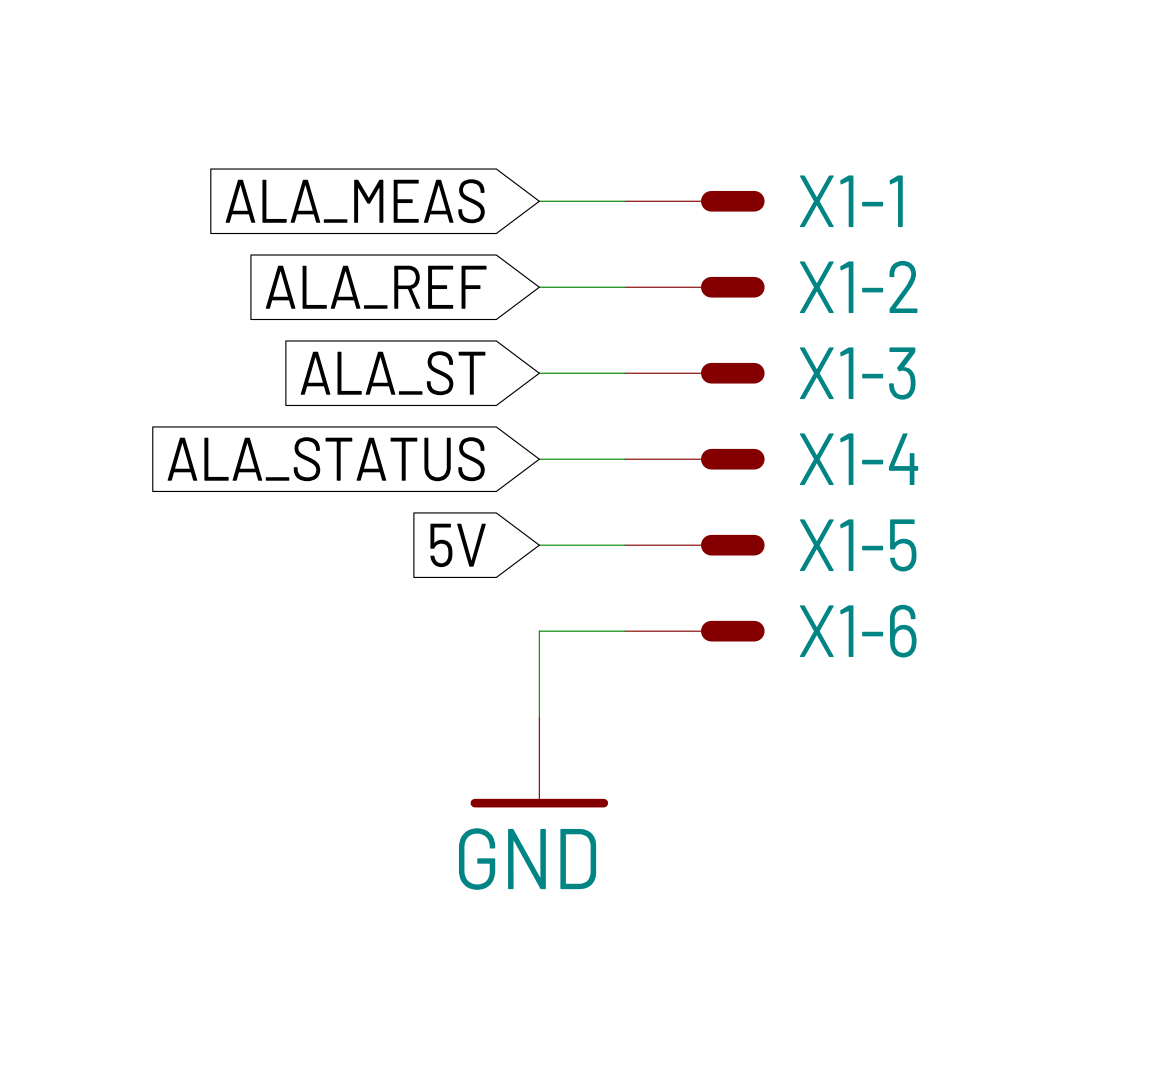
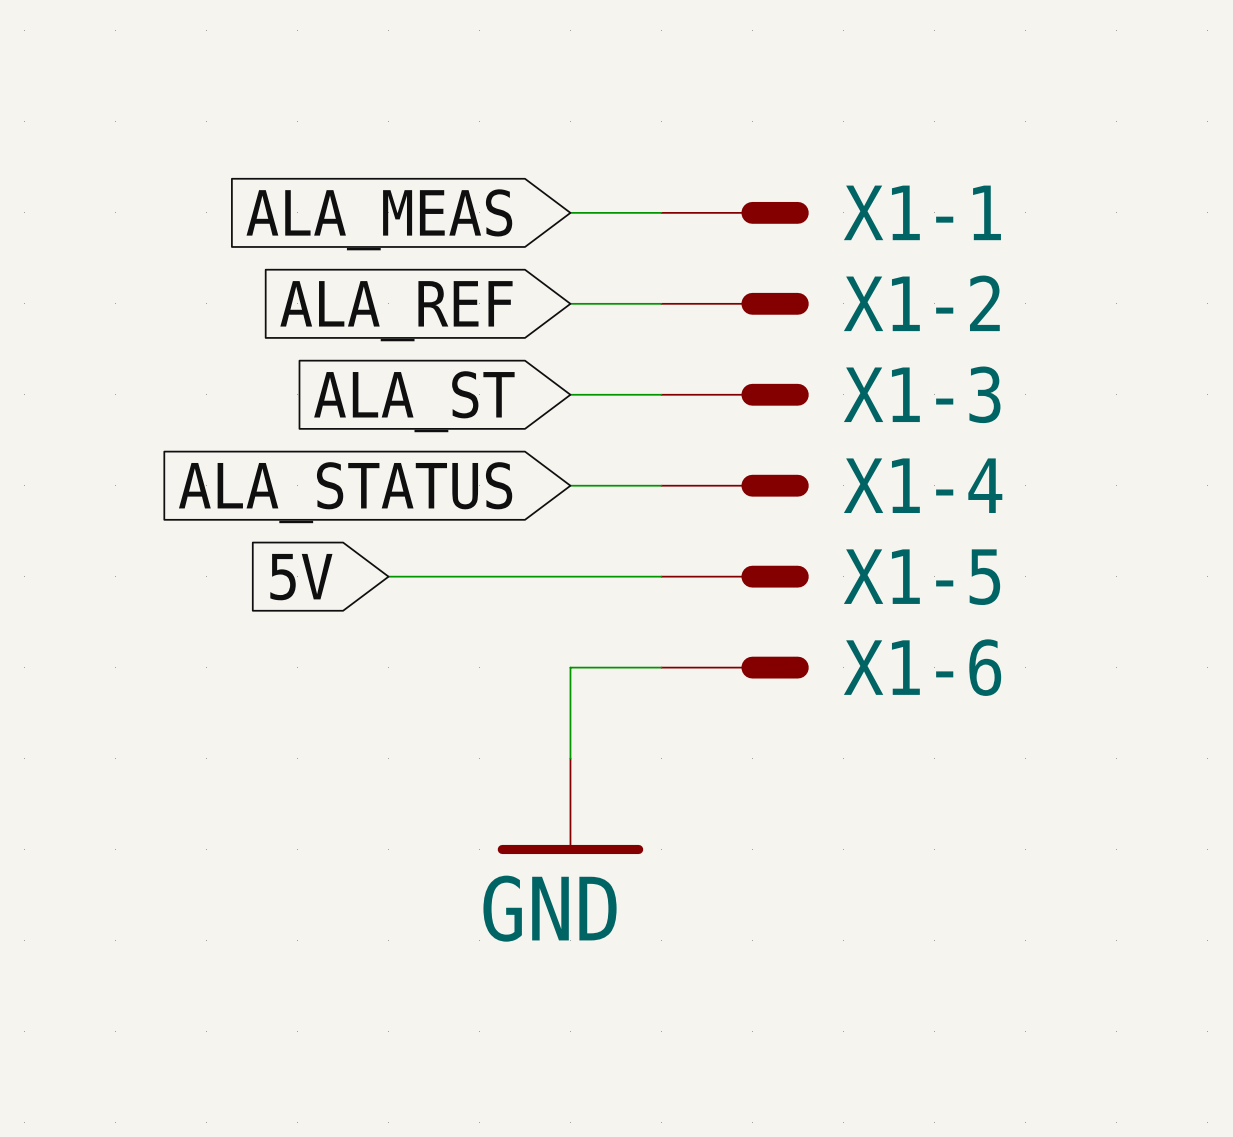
wire: none -> (388, 576) (570, 576)
global label position: 5V (458, 545) -> 5V (301, 577)

